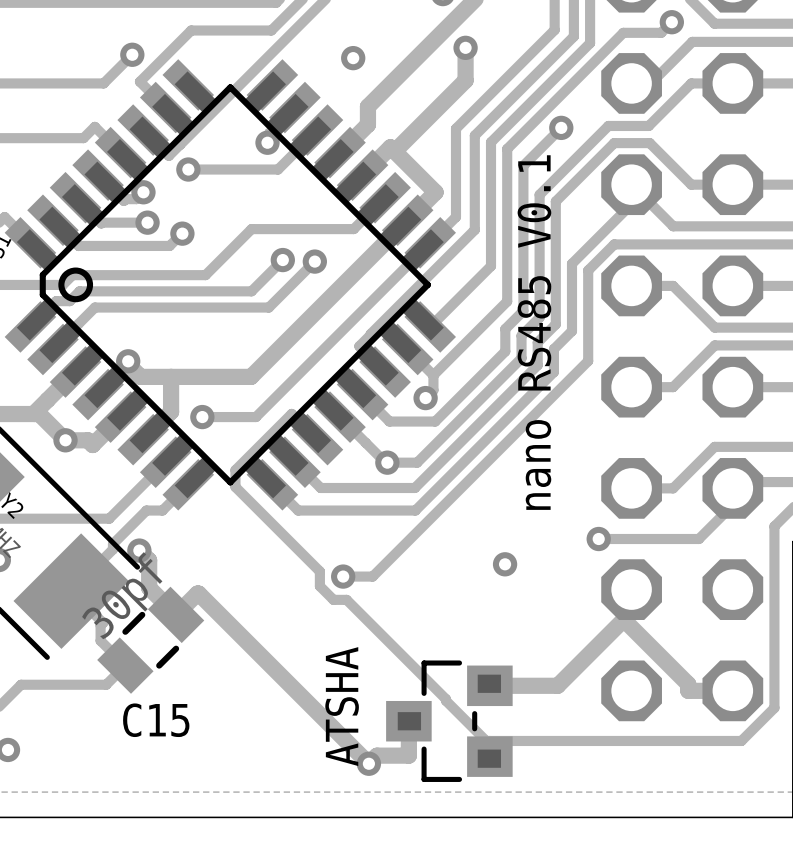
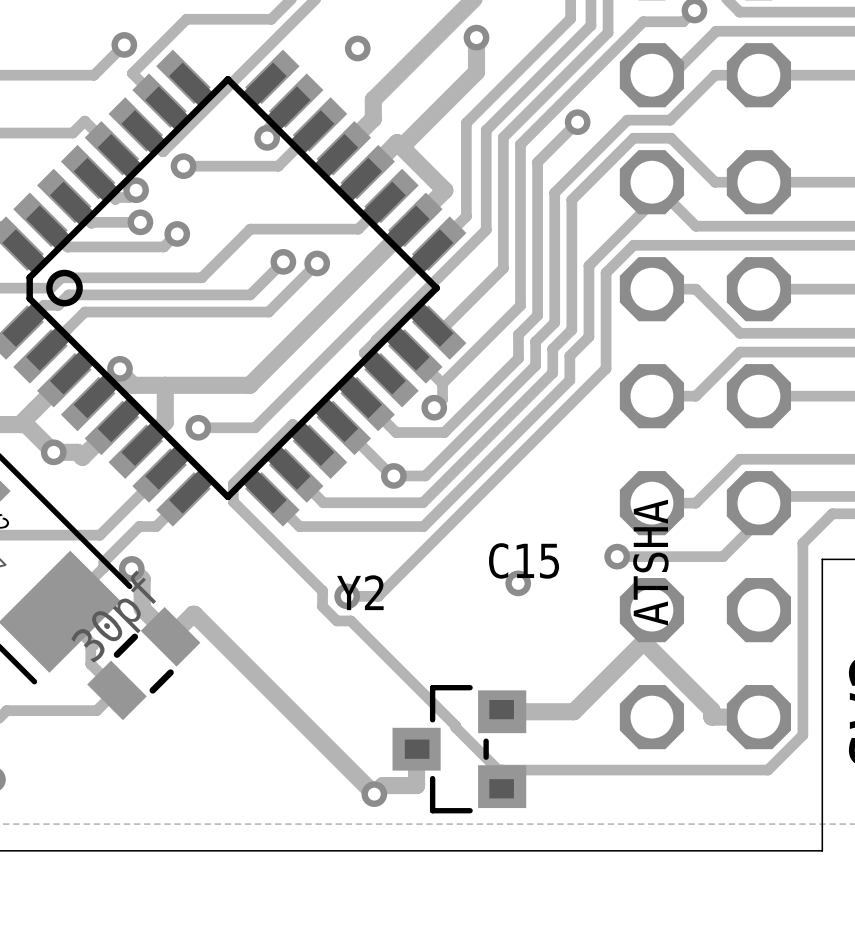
text: nano RS485 V0.1 (534, 332) -> none
text: none -> Y2 (360, 592)
text position: ATSHA (342, 706) -> ATSHA (650, 562)
text position: C15 (156, 720) -> C15 (524, 560)

